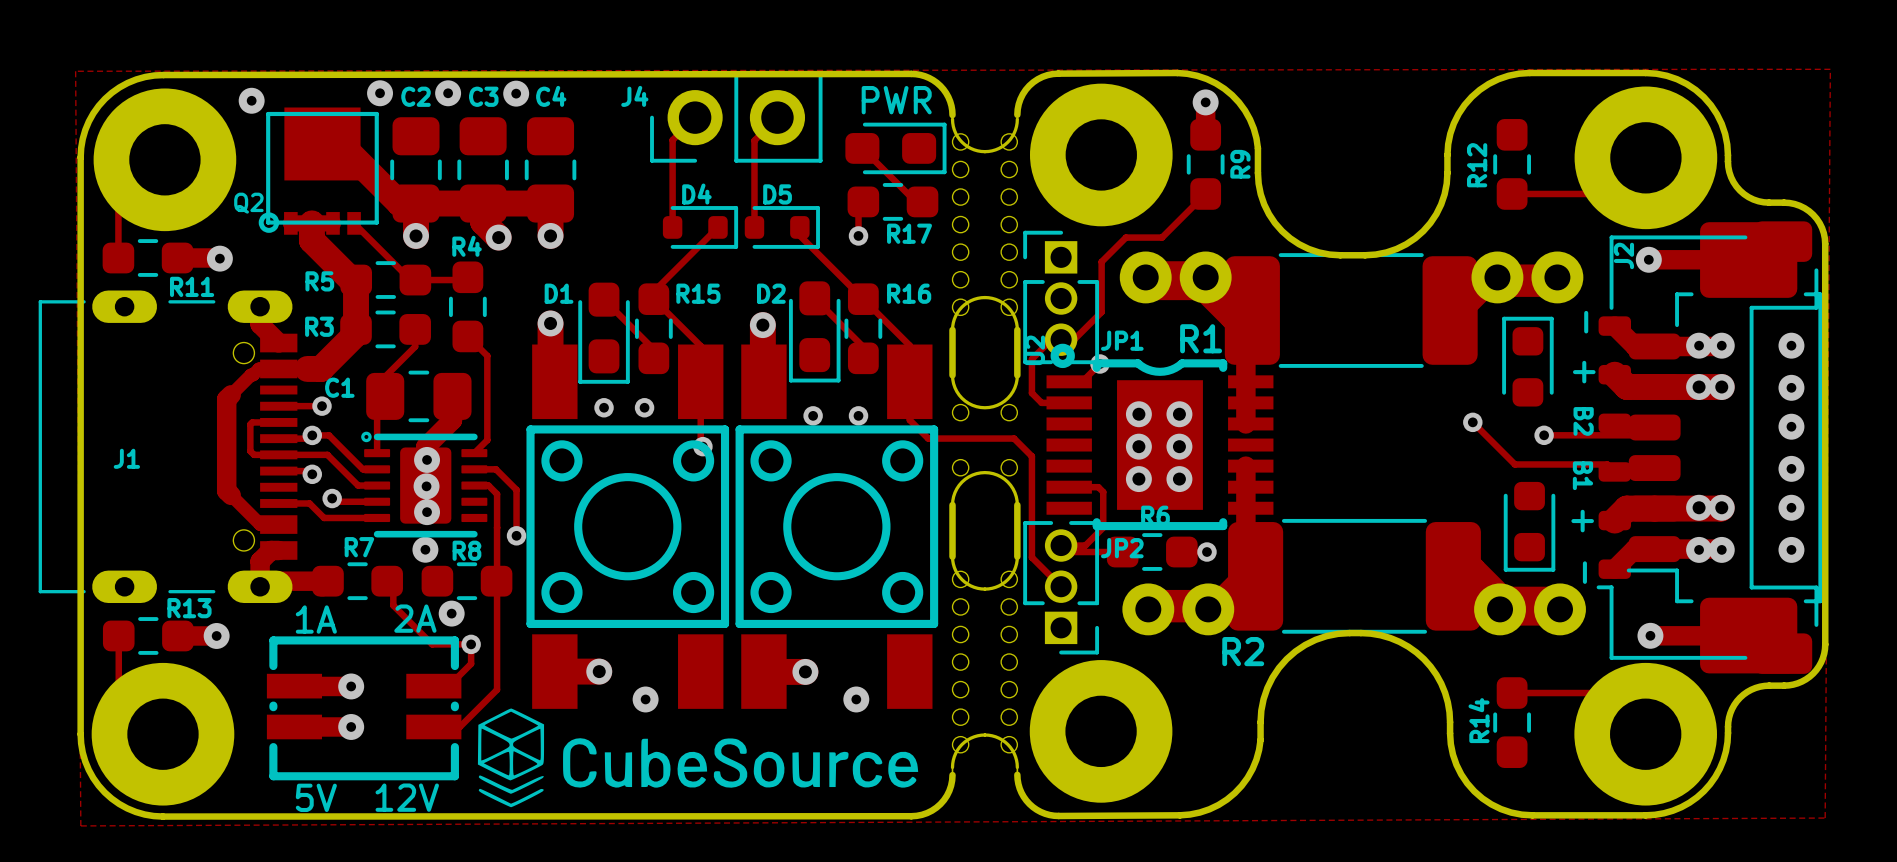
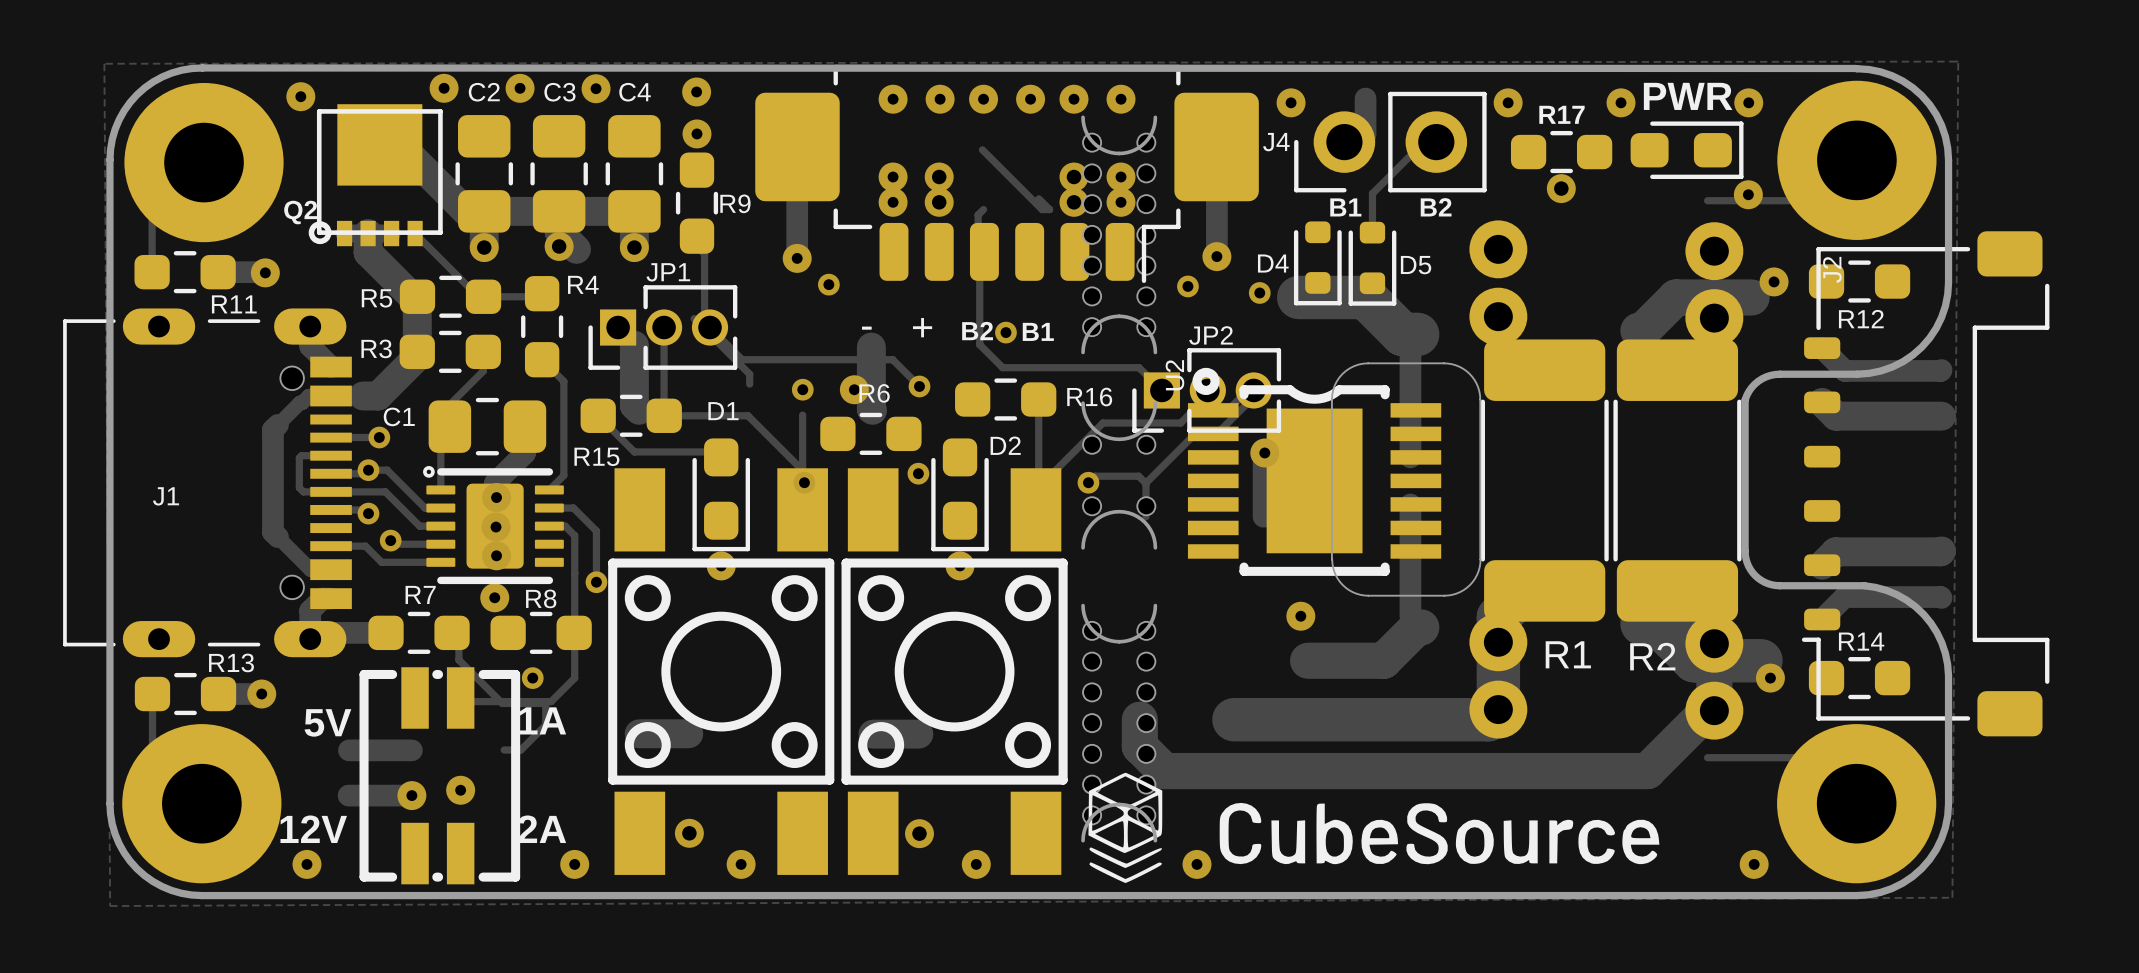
zone outline: (1736, 69) (1830, 69) (1825, 818) (1731, 818) -> (1958, 61) (1952, 897)
board edge: (163, 75) (915, 74) (933, 80) (943, 89) (950, 101) (952, 119) -> none
via: none -> (696, 91)
J4 name position: J4 (634, 96) -> J4 (1276, 142)
part value: PWR (896, 100) -> none
via: (1205, 102) -> none
via: none -> (893, 99)
via: none -> (940, 99)
via: none -> (983, 99)
via: none -> (1030, 99)
via: none -> (1073, 99)
via: none -> (1121, 99)
via: none -> (1291, 102)
via: none -> (1508, 102)
via: none -> (1621, 102)
via: none -> (1748, 102)
track: (695, 117) (672, 140) (672, 227) -> none
J4 position: (736, 117) -> (1390, 142)
track: (777, 117) (754, 140) (754, 227) -> none
board edge: (1017, 119) (1018, 104) (1025, 89) (1037, 79) (1047, 75) (1177, 73) (1206, 79) (1232, 95) (1249, 119) (1257, 148) (1257, 172) (1260, 194) (1268, 214) (1282, 231) (1299, 244) (1318, 252) (1340, 255) (1365, 255) (1396, 249) (1415, 238) (1430, 223) (1444, 194) (1448, 144) (1453, 123) (1464, 105) (1488, 83) (1519, 73) (1645, 72) (1677, 79) (1695, 90) (1710, 105) (1721, 123) (1727, 144) (1729, 172) (1736, 186) (1748, 197) (1758, 201) (1789, 203) (1804, 208) (1819, 223) (1825, 243) (1824, 653) (1816, 670) (1801, 681) (1788, 685) (1760, 686) (1743, 694) (1732, 708) (1728, 726) -> (202, 67) (1855, 68) (1880, 71) (1892, 75) (1912, 87) (1921, 95) (1936, 114) (1945, 136) (1948, 160) (1948, 282) (1945, 306) (1941, 317) (1929, 338) (1912, 355) (1892, 367) (1880, 371) (1857, 374) (1775, 374) (1762, 378) (1751, 387) (1745, 399) (1745, 554) (1752, 572) (1768, 583) (1779, 585) (1875, 587) (1896, 594) (1923, 614) (1941, 642) (1947, 664) (1948, 795)
part footprint: [845, 122, 947, 175] -> [755, 64, 1259, 284]
track: none -> (1436, 129) (1372, 193) (1372, 232)
via: none -> (696, 133)
part: none -> PWR (1687, 150)
part: (1101, 154) -> none
R9 position: (1205, 164) -> (696, 203)
R9 name rotation: 0° (1240, 164) -> 90° clockwise (735, 203)
R12 rotation: 0° (1512, 164) -> 90° clockwise (1859, 281)
R12 position: (1512, 164) -> (1859, 281)
via: none -> (893, 177)
via: none -> (939, 177)
via: none -> (1073, 177)
via: none -> (1121, 177)
track: none -> (797, 187) (797, 258)
track: none -> (1216, 187) (1216, 256)
via: none -> (1561, 188)
via: none -> (1748, 194)
track: (1205, 193) (1162, 237) (1125, 237) (1101, 261) (1101, 312) (1074, 339) (1051, 339) (1031, 359) (1031, 393) (1041, 402) (1064, 402) -> none
via: none -> (893, 202)
via: none -> (939, 202)
via: none -> (1073, 202)
via: none -> (1121, 202)
text: none -> B1 (1345, 207)
text: none -> B2 (1436, 207)
R17 position: (892, 201) -> (1561, 152)
D4 rotation: 0° (700, 227) -> 90° clockwise (1317, 263)
D4 position: (700, 227) -> (1317, 263)
track: (717, 227) (653, 291) (653, 299) (700, 346) (700, 444) (702, 446) -> none
D5 rotation: 0° (782, 227) -> 90° clockwise (1372, 263)
D5 position: (782, 227) -> (1372, 263)
track: (799, 227) (799, 235) (909, 345) (909, 420) (928, 438) (1014, 438) (1031, 456) (1031, 557) (1061, 586) -> none
R17 name position: R17 (909, 233) -> R17 (1561, 114)
track: none -> (696, 246) (704, 254) (704, 322) (742, 359) (892, 359) (919, 386)
via: (858, 235) -> none
via position: (498, 237) -> (559, 246)
track: none -> (979, 256) (979, 344) (1002, 367) (1139, 367) (1161, 389)
via: none -> (1216, 256)
via: none -> (797, 258)
R4 name position: R4 (467, 246) -> R4 (583, 284)
R1 footprint: [1119, 251, 1584, 304] -> [1331, 220, 1528, 739]
track: (1648, 259) (1712, 259) -> none
via: (1648, 259) -> none
via: none -> (1774, 281)
via: none -> (828, 284)
via: none -> (1187, 286)
via: none -> (1259, 292)
D1 name position: D1 (559, 293) -> D1 (723, 411)
R15 name position: R15 (698, 293) -> R15 (596, 456)
D2 name position: D2 (771, 293) -> D2 (1005, 445)
JP1 rotation: 0° (1061, 297) -> 90° counterclockwise (662, 327)
JP1 position: (1061, 297) -> (662, 327)
track: (814, 298) (863, 346) (863, 358) -> none
text: none -> - (866, 328)
text: none -> + (922, 327)
text: none -> B2 (977, 331)
part: (1351, 310) -> none
text: none -> B1 (1038, 331)
via: none -> (1005, 332)
track: none -> (664, 337) (664, 415)
text: - (1586, 322) -> none
via: (550, 323) -> none
via: (762, 325) -> none
R15 rotation: 0° (653, 328) -> 90° clockwise (631, 415)
R15 position: (653, 328) -> (631, 415)
R16 rotation: 0° (863, 328) -> 90° clockwise (1005, 399)
board edge: (952, 329) (952, 375) -> none
board edge: (1017, 329) (1017, 375) -> none
D2 position: (814, 331) -> (960, 494)
D1 position: (604, 333) -> (721, 494)
R1 name position: R1 (1201, 338) -> R1 (1568, 654)
via: (1699, 345) -> none
via: (1721, 345) -> none
via: (1791, 345) -> none
via: none -> (919, 386)
part: (1527, 361) -> none
via: none -> (802, 389)
via: none -> (854, 389)
track: none -> (1207, 395) (1180, 423) (1102, 423) (1035, 489)
track: none -> (1253, 396) (1213, 437) (1191, 437) (1145, 483) (1145, 516)
track: none -> (1038, 399) (1038, 507)
text: + (1584, 372) -> none
track: none -> (598, 415) (634, 451) (715, 451)
track: none -> (664, 415) (748, 415) (802, 470)
track: none -> (802, 415) (802, 509)
via: (1699, 387) -> none
via: (1721, 387) -> none
via: (1791, 387) -> none
via: (604, 407) -> none
via: (644, 407) -> none
via position: (1138, 414) -> (1264, 452)
via: (1179, 414) -> none
via position: (813, 415) -> (918, 473)
via: (858, 415) -> none
track: none -> (1264, 452) (1263, 516)
text: B2 (1583, 421) -> none
track: (1472, 422) (1514, 464) (1607, 464) (1614, 471) -> none
via: (1472, 422) -> none
via: (1791, 426) -> none
track: (1654, 427) (1646, 435) (1544, 435) -> none
via: (1544, 435) -> none
part: none -> (1544, 480)
part: none -> (1677, 480)
track: none -> (1088, 482) (1094, 476) (1138, 476) (1145, 483)
via: none -> (1088, 482)
via: (1138, 446) -> none
via: (1179, 446) -> none
part: (1724, 447) -> none
via: (1791, 468) -> none
text: B1 (1582, 475) -> none
via: (1138, 479) -> none
via: (1179, 479) -> none
track: (1069, 487) (1098, 487) (1103, 492) (1103, 527) (1085, 545) (1061, 545) (1067, 552) (1122, 552) -> none
board edge: (952, 505) (952, 556) -> none
board edge: (1017, 505) (1017, 556) -> none
via: (1699, 507) -> none
via: (1721, 507) -> none
via: (1791, 507) -> none
via: none -> (721, 565)
via: none -> (960, 565)
text: + (1582, 521) -> none
part position: (627, 526) -> (721, 671)
part position: (836, 526) -> (954, 671)
part: (1529, 526) -> none
track: none -> (1524, 590) (1498, 617) (1498, 709) (1488, 719) (1233, 719)
track: none -> (1676, 590) (1714, 628) (1714, 704) (1647, 771) (1164, 771) (1139, 746) (1139, 719) (1141, 728)
via: (1699, 549) -> none
via: (1721, 549) -> none
via: (1791, 549) -> none
R6 position: (1152, 552) -> (870, 433)
via: (1206, 552) -> none
via: none -> (1300, 616)
text: - (1584, 572) -> none
part: (1354, 576) -> none
JP2 rotation: 0° (1061, 587) -> 90° clockwise (1206, 390)
JP2 position: (1061, 587) -> (1206, 390)
R2 rotation: 0° (1354, 609) -> 90° clockwise (1714, 480)
via: (451, 613) -> none
text position: 2A (415, 618) -> 2A (542, 829)
text position: 1A (316, 619) -> 1A (542, 720)
track: (497, 621) (497, 689) (459, 726) (446, 726) -> (574, 678) (551, 701) (464, 701)
via: none -> (1770, 678)
track: (1650, 635) (1712, 635) -> none
via: (1650, 635) -> none
via position: (471, 644) -> (532, 678)
R2 name position: R2 (1243, 651) -> R2 (1652, 656)
via position: (599, 671) -> (689, 833)
via position: (805, 671) -> (919, 833)
via position: (351, 686) -> (460, 790)
via: (645, 699) -> none
via: (856, 699) -> none
drawing: none -> [1088, 772, 1660, 883]
part rotation: 0° (364, 708) -> 90° counterclockwise (439, 775)
drawing: [477, 708, 919, 808] -> none
R14 rotation: 0° (1512, 722) -> 90° clockwise (1859, 678)
R14 position: (1512, 722) -> (1859, 678)
part: (1101, 731) -> none
board edge: (1728, 732) (1723, 760) (1710, 784) (1697, 797) (1672, 810) (1645, 815) (1532, 815) (1511, 812) (1482, 798) (1461, 774) (1450, 744) (1449, 712) (1445, 692) (1436, 674) (1423, 659) (1408, 646) (1390, 638) (1370, 633) (1349, 633) (1338, 633) (1315, 639) (1295, 651) (1278, 667) (1272, 677) (1263, 699) (1259, 749) (1252, 768) (1234, 793) (1209, 809) (1179, 815) (1049, 814) (1036, 809) (1023, 796) (1018, 784) (1017, 767) -> none
board edge: (952, 767) (951, 785) (944, 800) (931, 810) (911, 816) (162, 816) -> (1948, 802) (1947, 815) (1941, 838) (1936, 849) (1921, 868) (1912, 876) (1891, 888) (1880, 892) (1856, 895) (201, 895)
via: none -> (306, 864)
via: none -> (574, 864)
via: none -> (741, 864)
via: none -> (976, 864)
via: none -> (1196, 864)
via: none -> (1754, 864)
text position: 5V (316, 797) -> 5V (327, 722)
text position: 12V (407, 797) -> 12V (313, 829)

